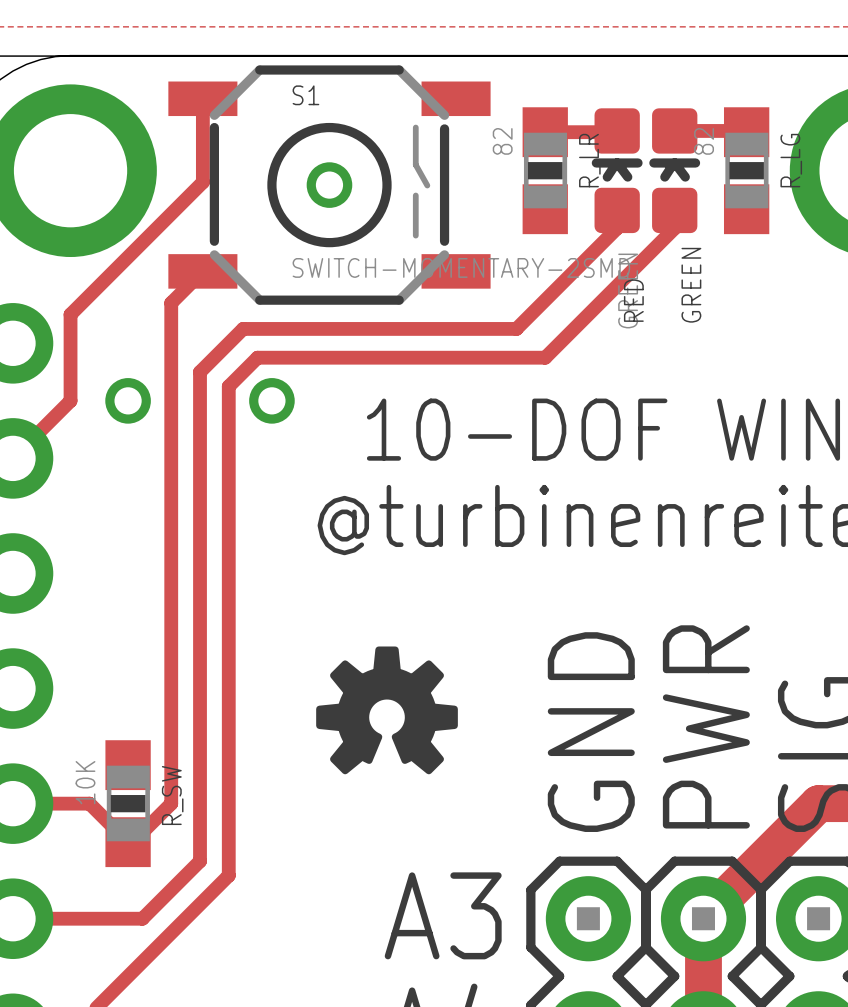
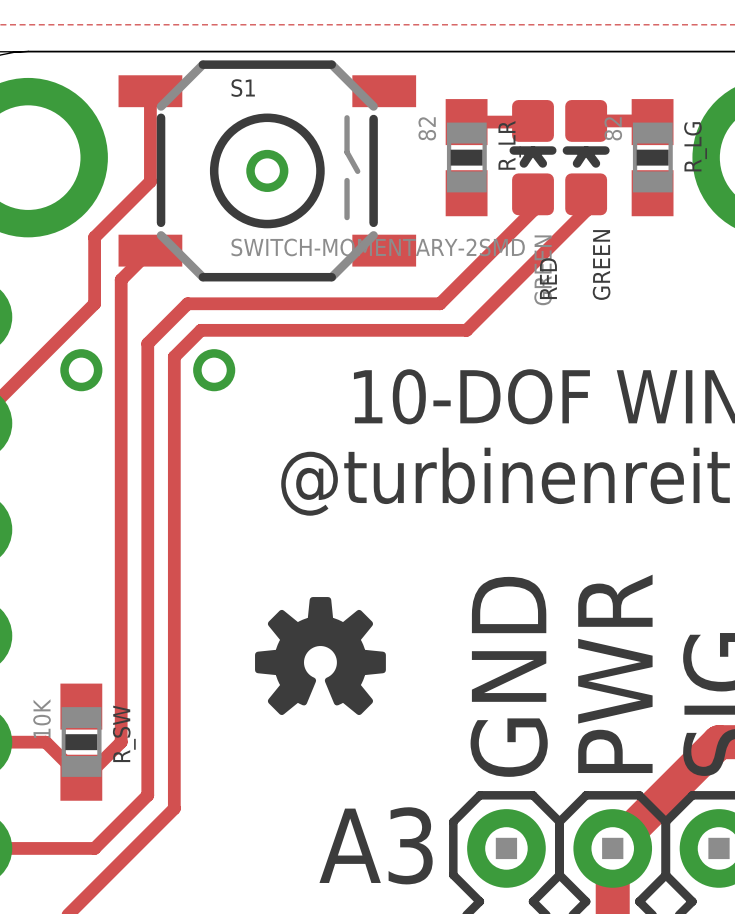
track: (202, 182) (70, 314) (70, 400) -> (150, 168) (150, 181) (94, 237) (94, 303) (28, 370)

